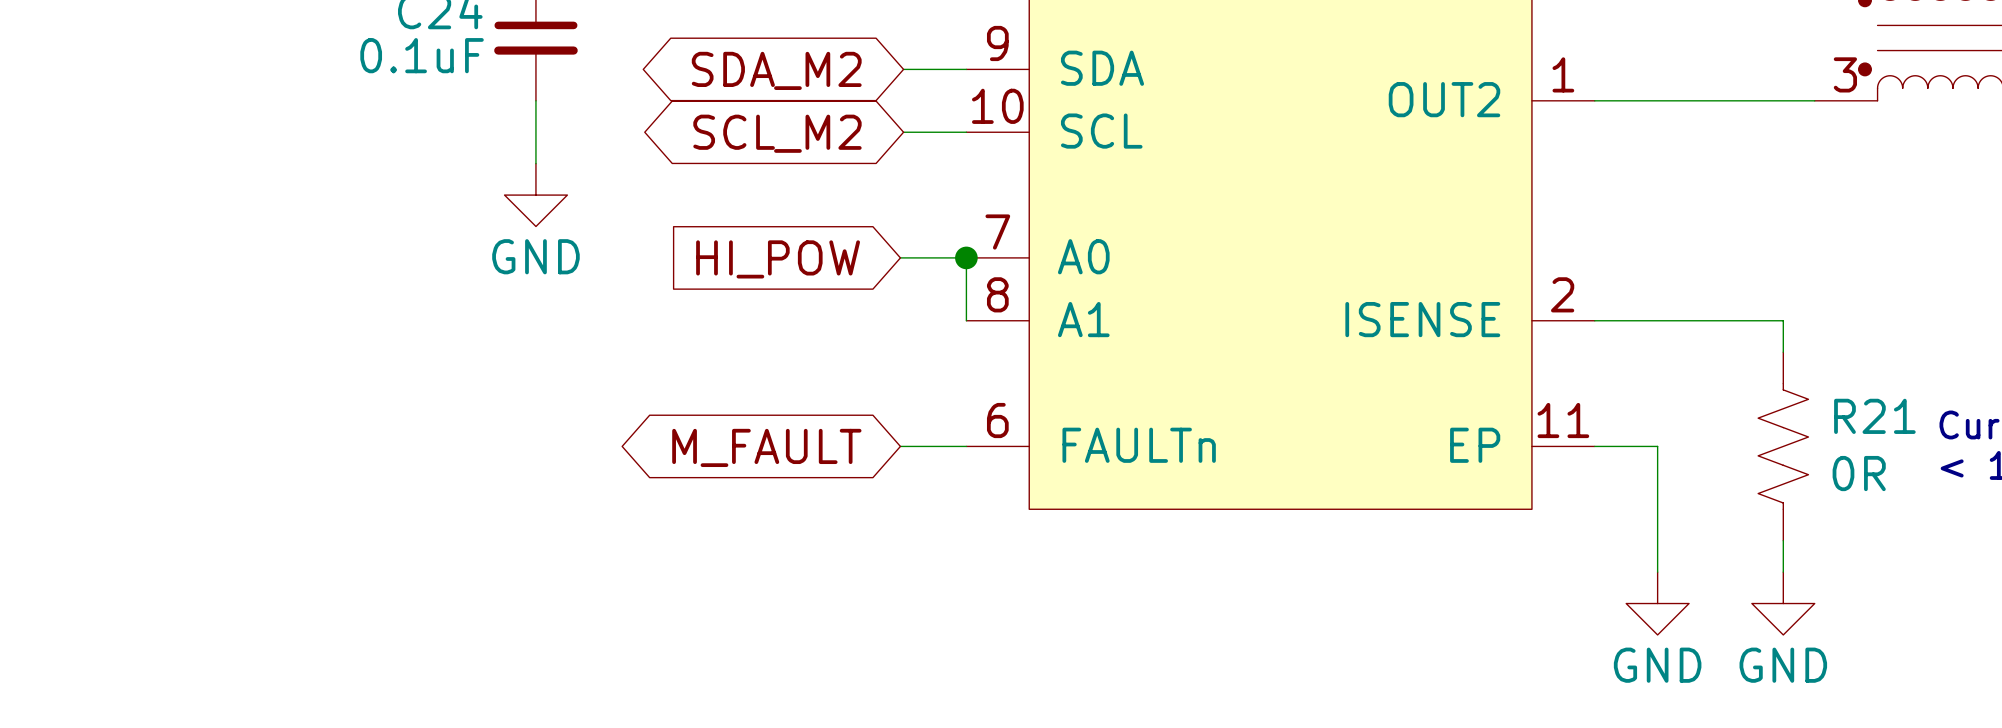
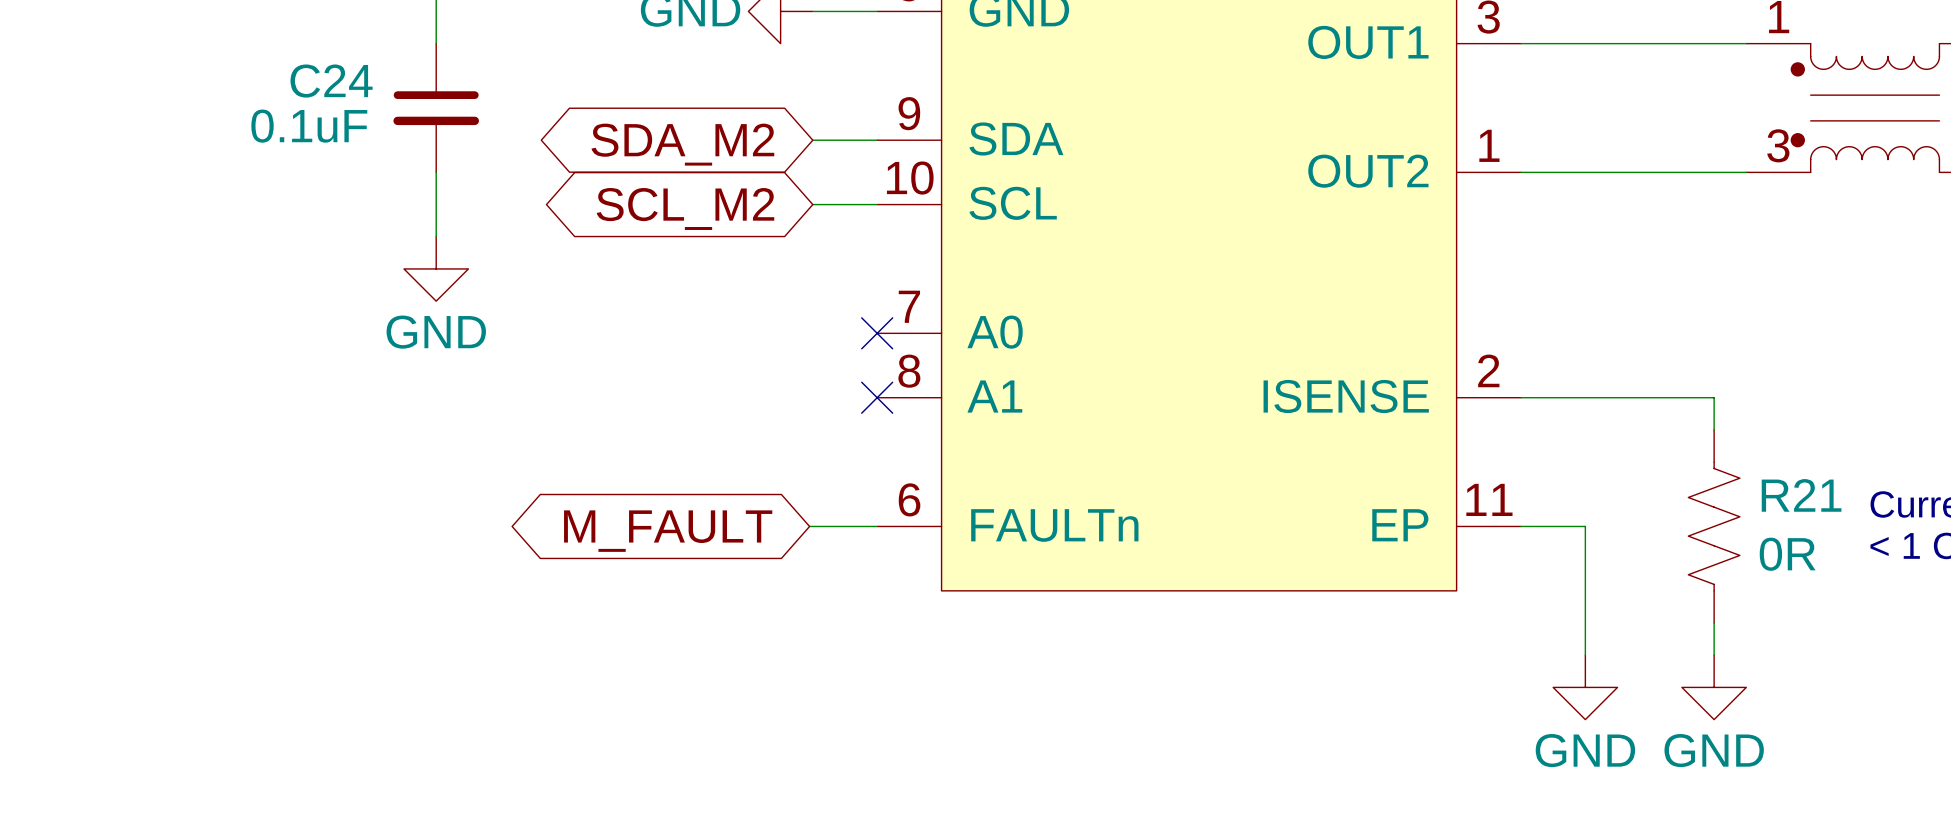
wire: (900, 257) (966, 257) (966, 320) -> none
junction: (966, 257) -> none
no-connect mark: none -> (877, 333)
global label: HI_POW (778, 259) -> none
no-connect mark: none -> (877, 397)

